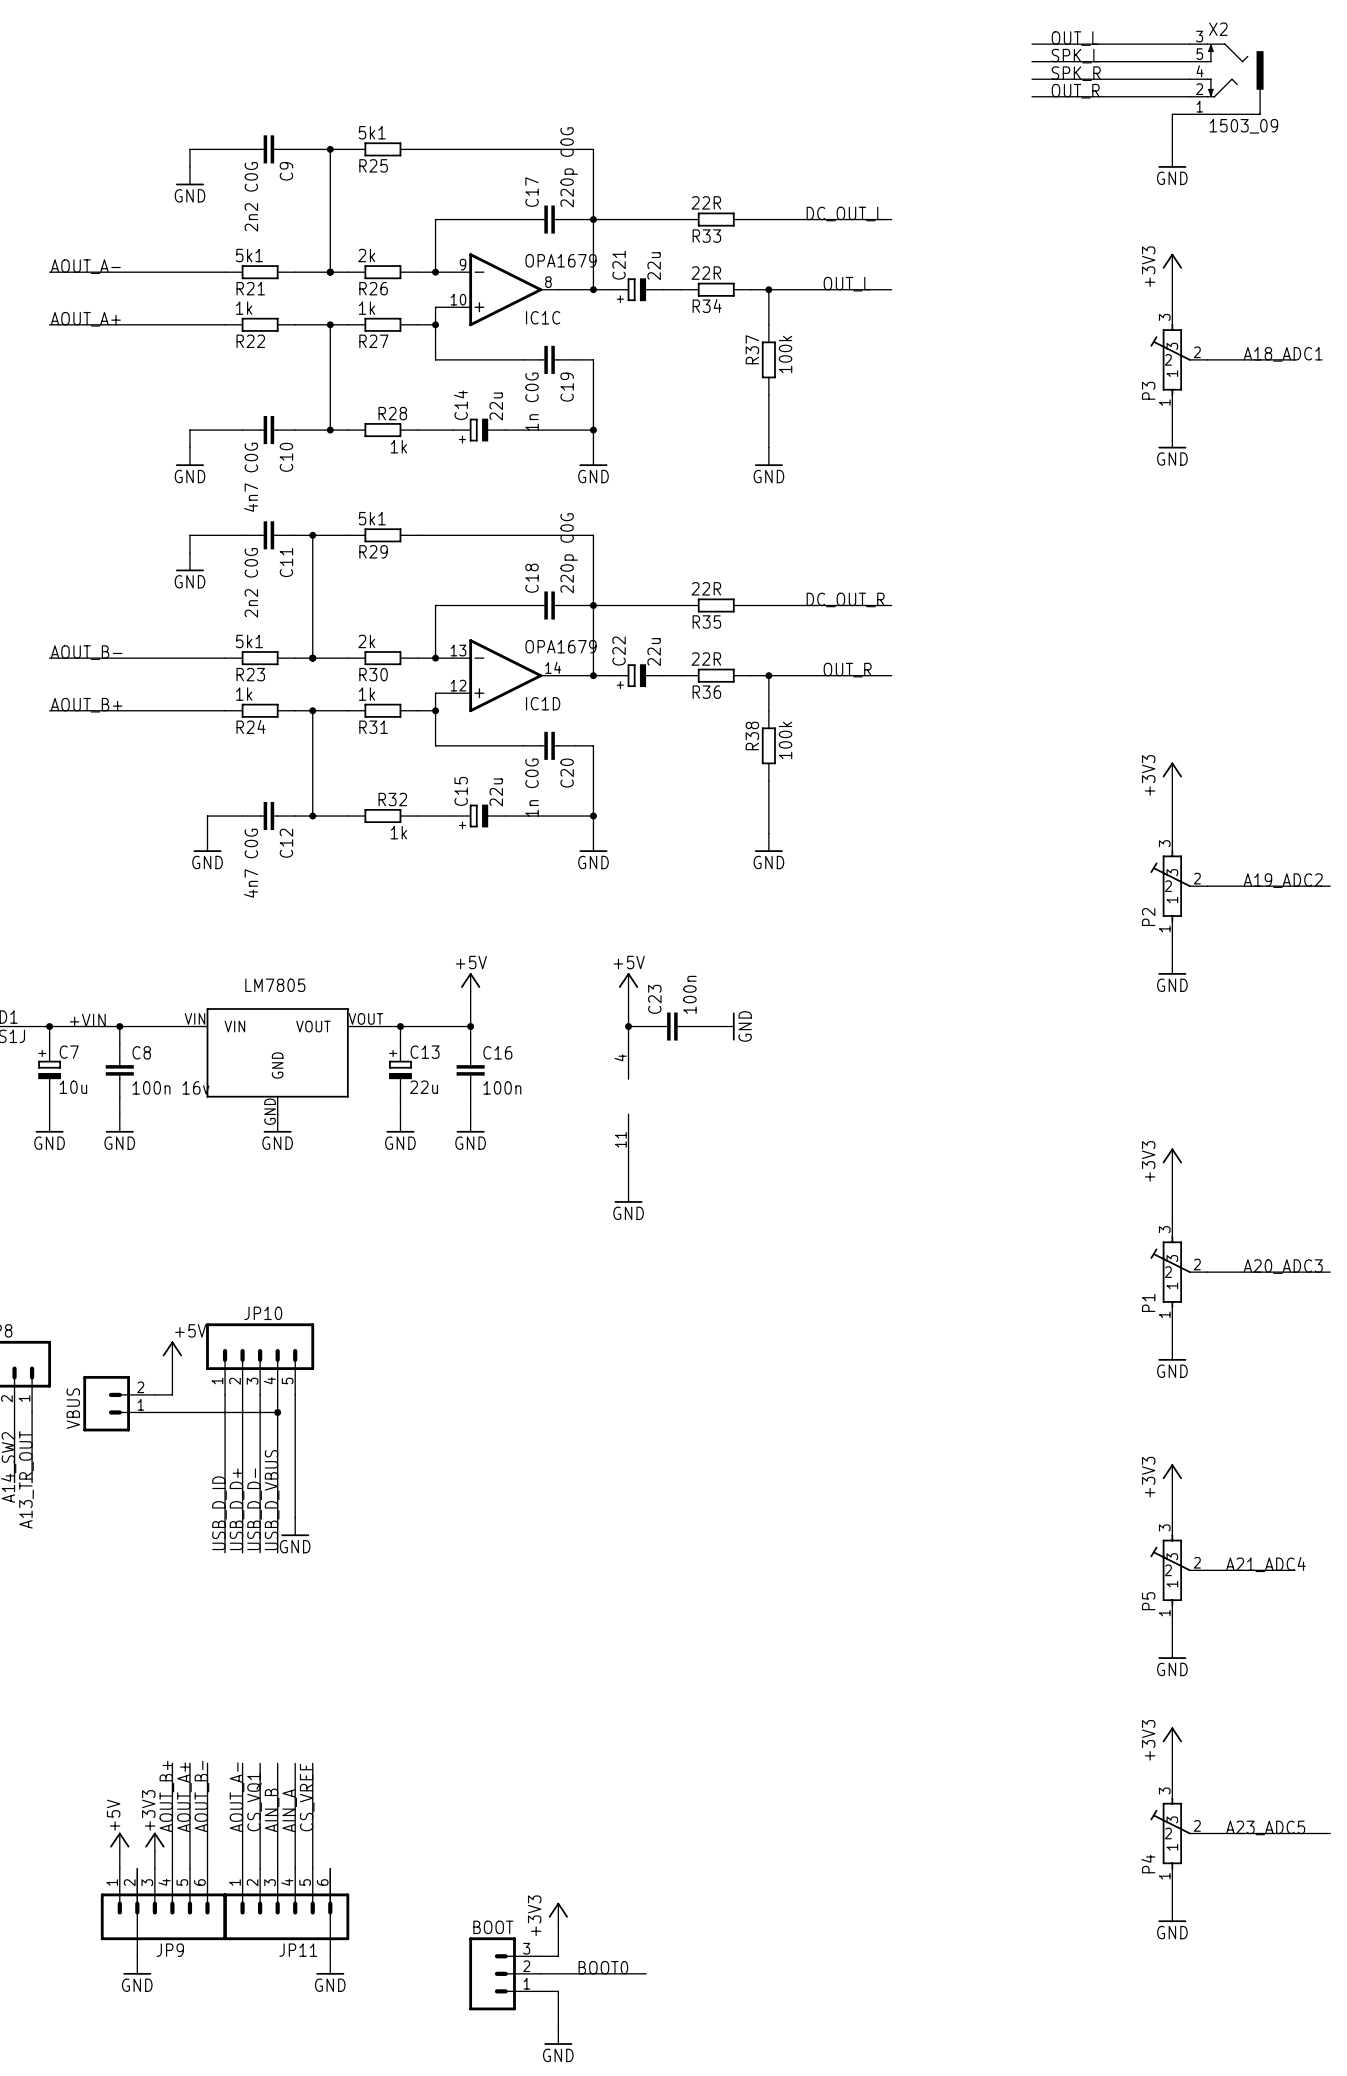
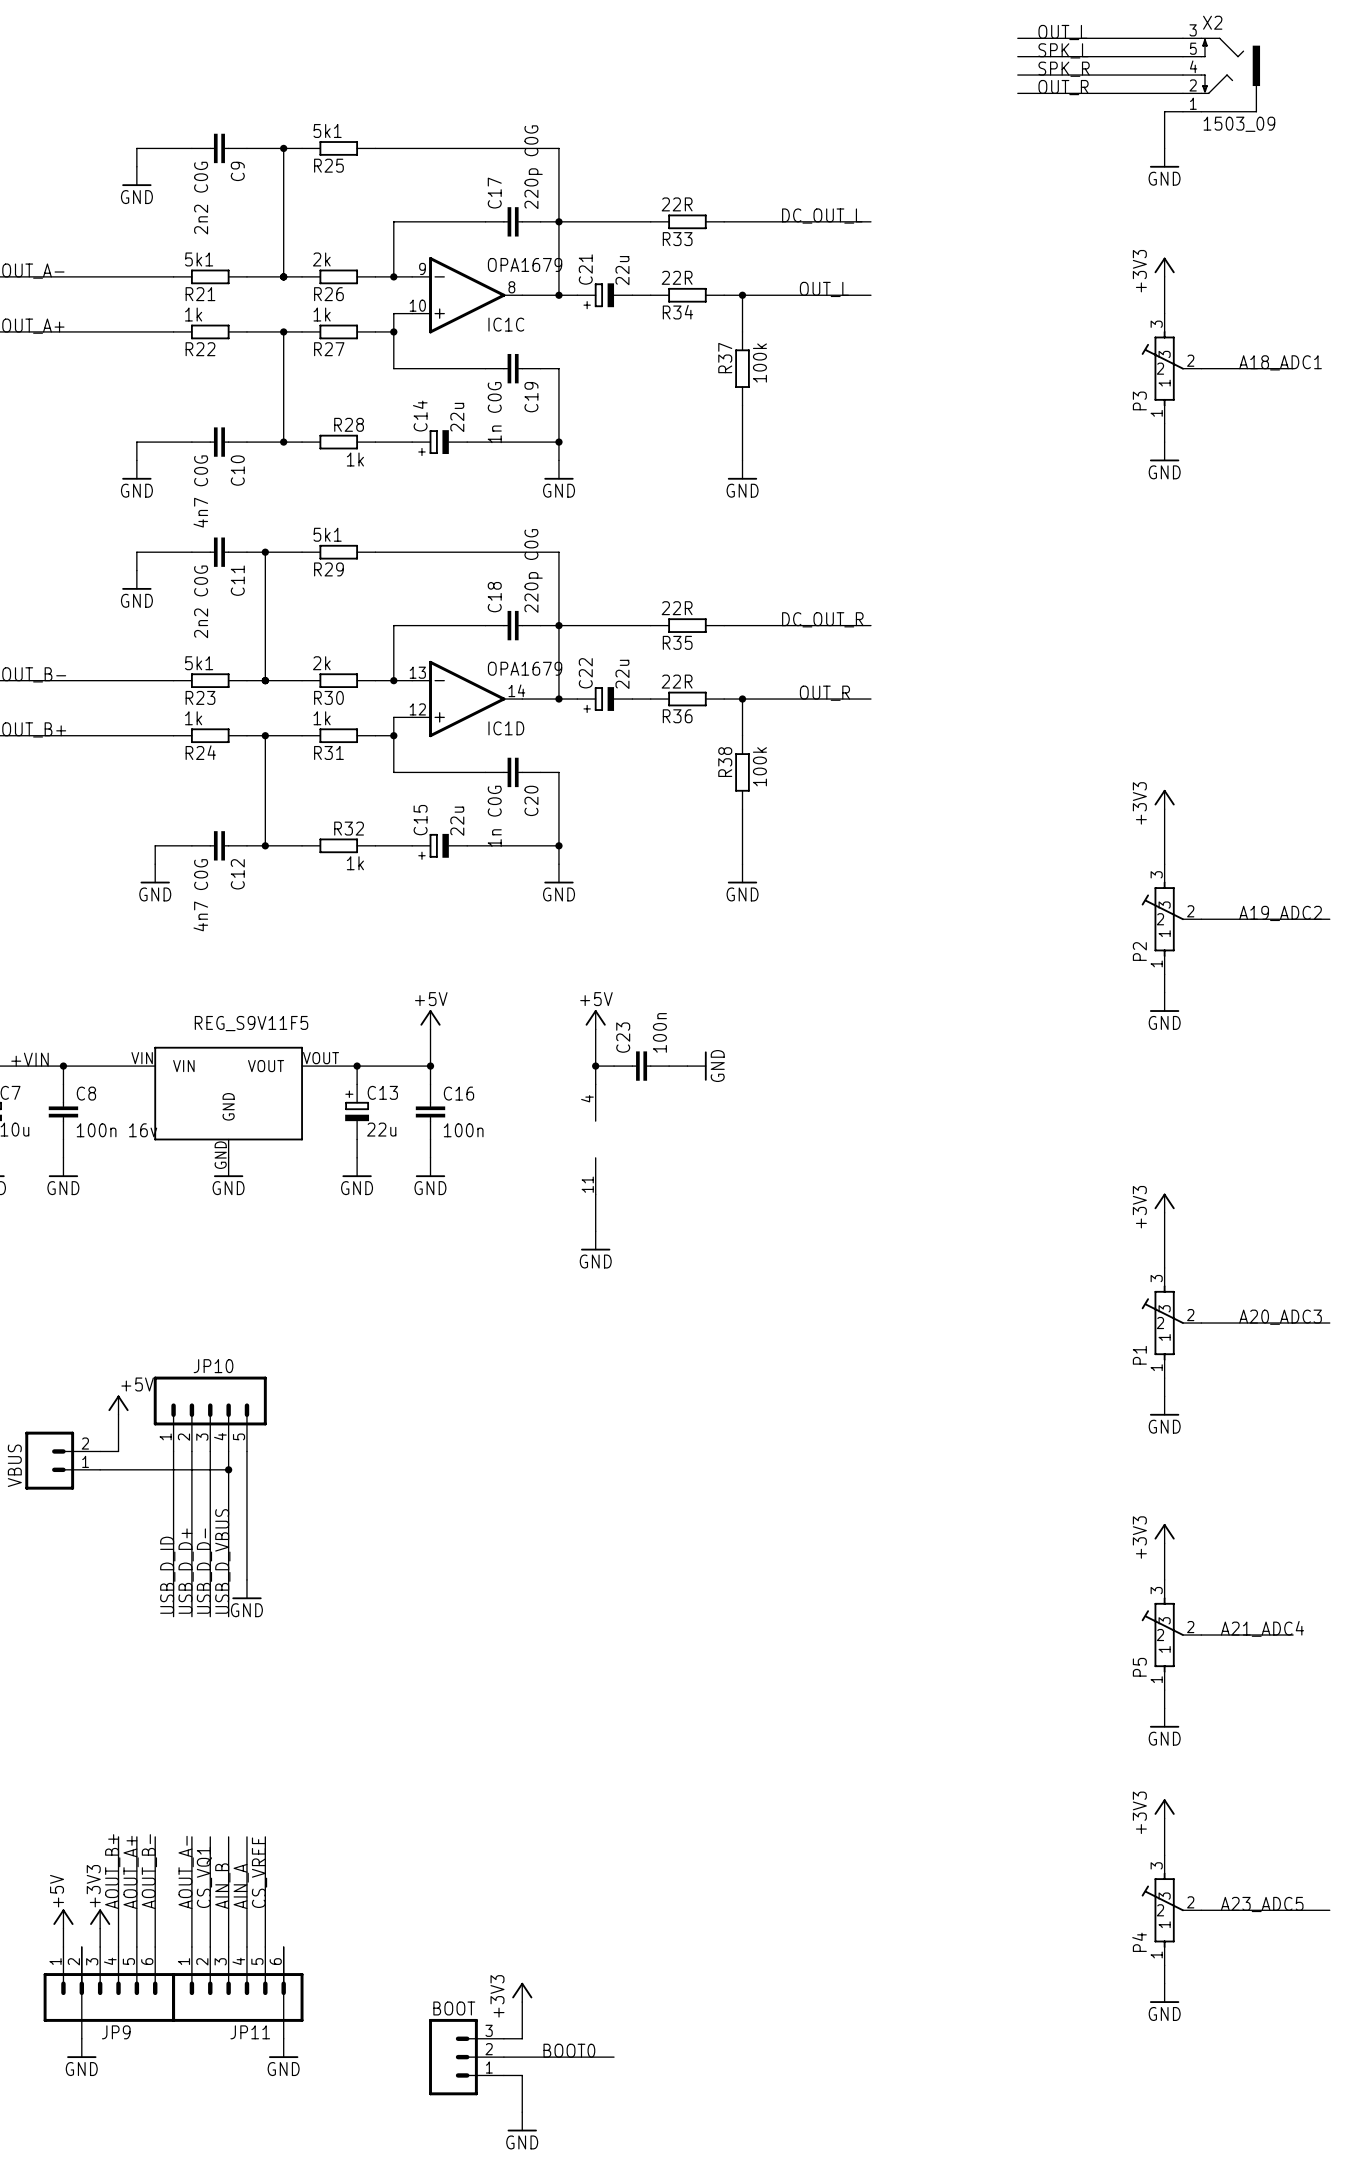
part value: LM7805 (275, 985) -> REG_S9V11F5 (251, 1023)

